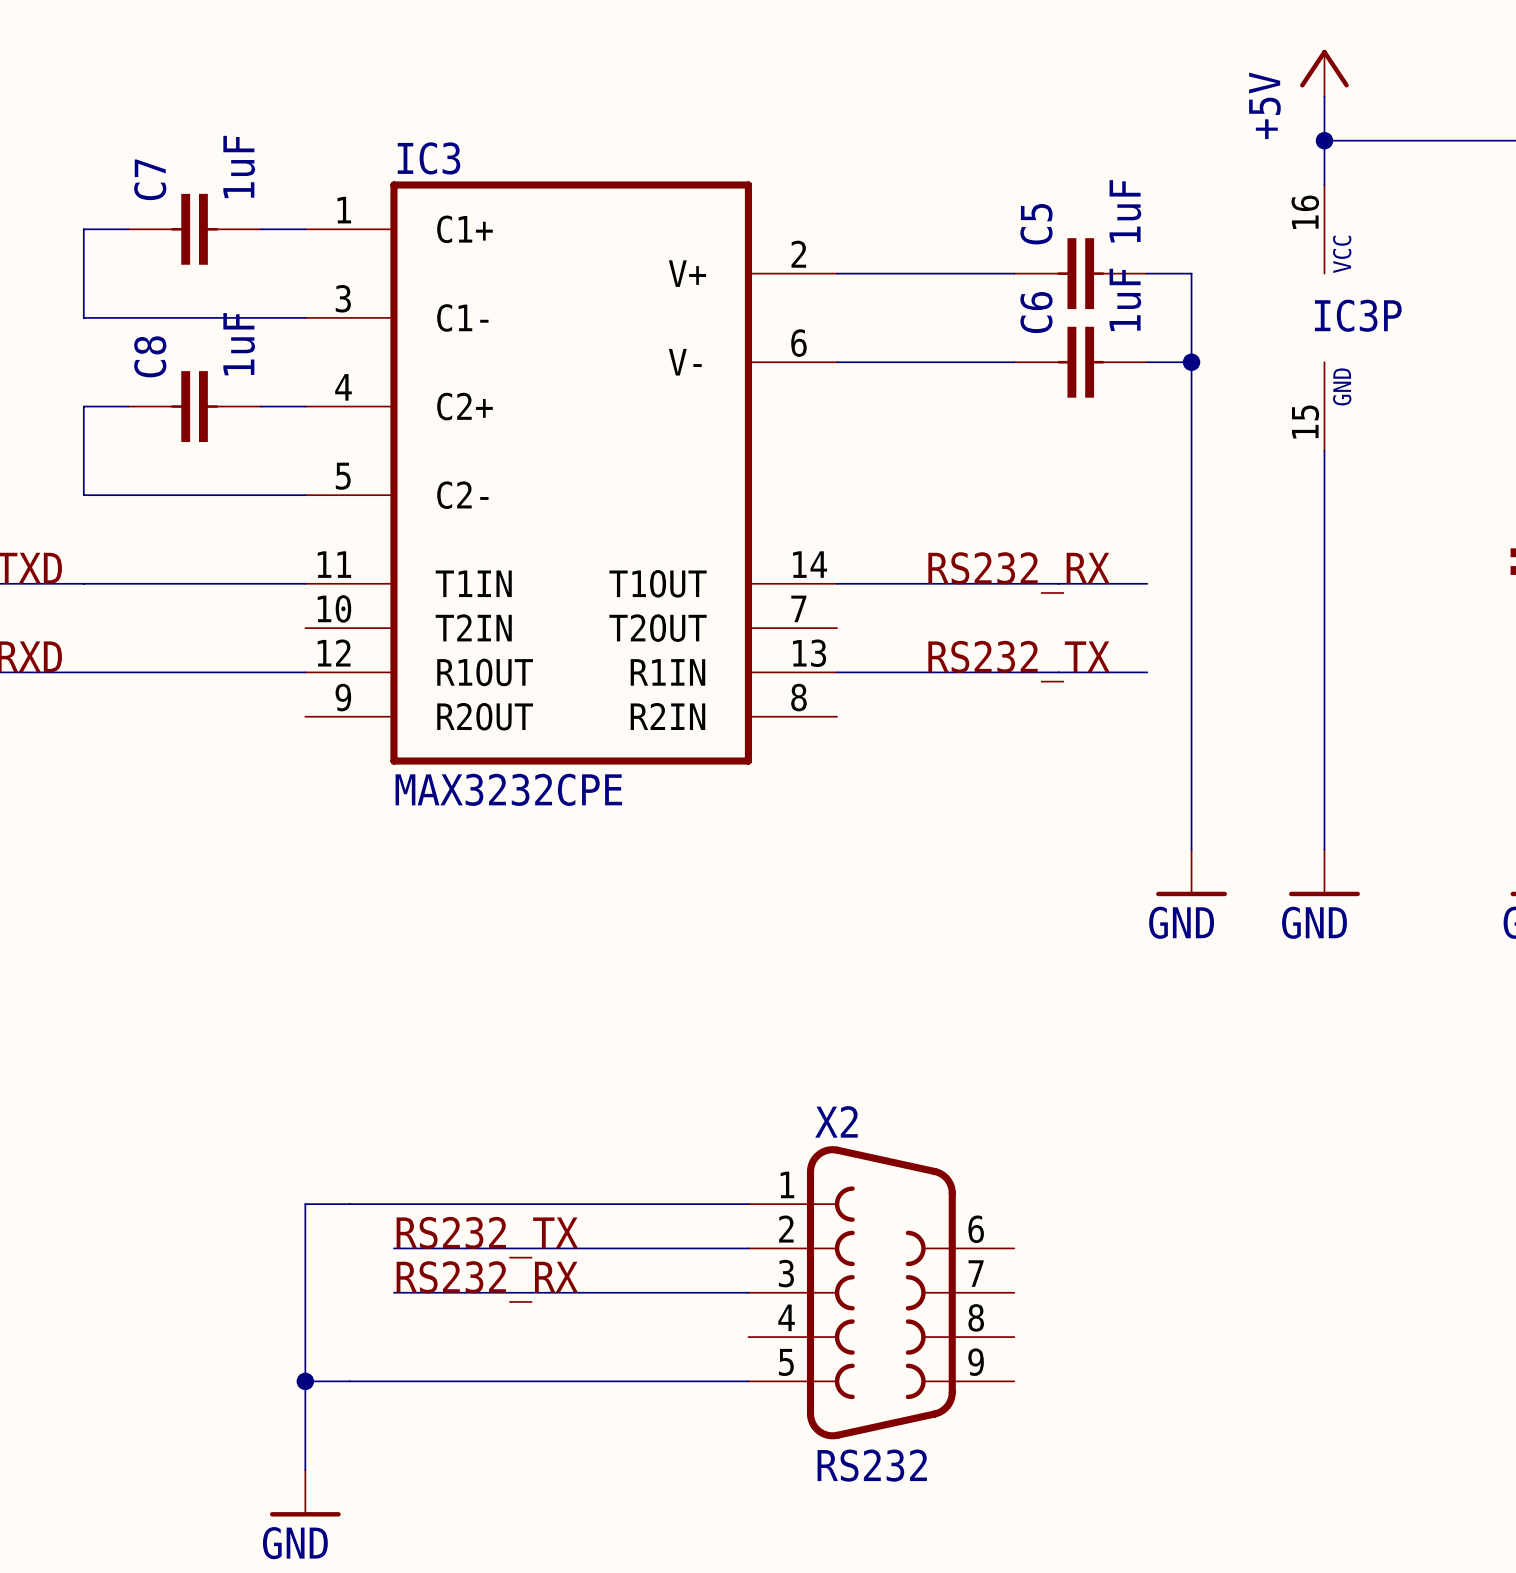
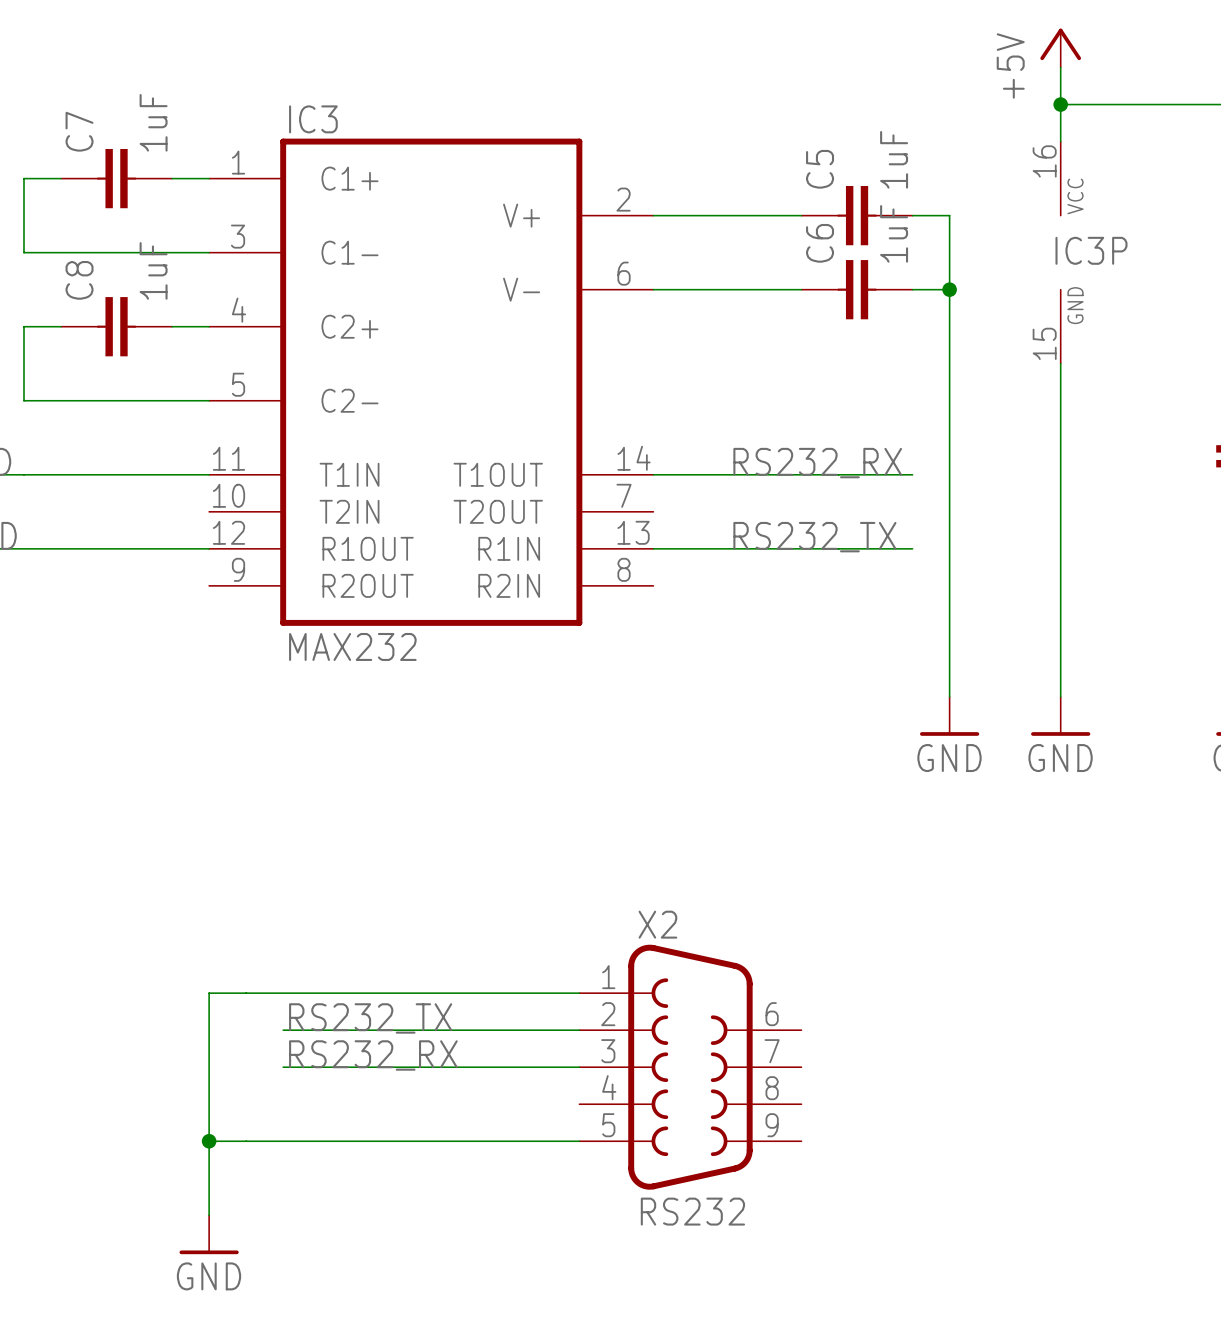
IC3 value: MAX3232CPE (508, 789) -> MAX232 (352, 646)

